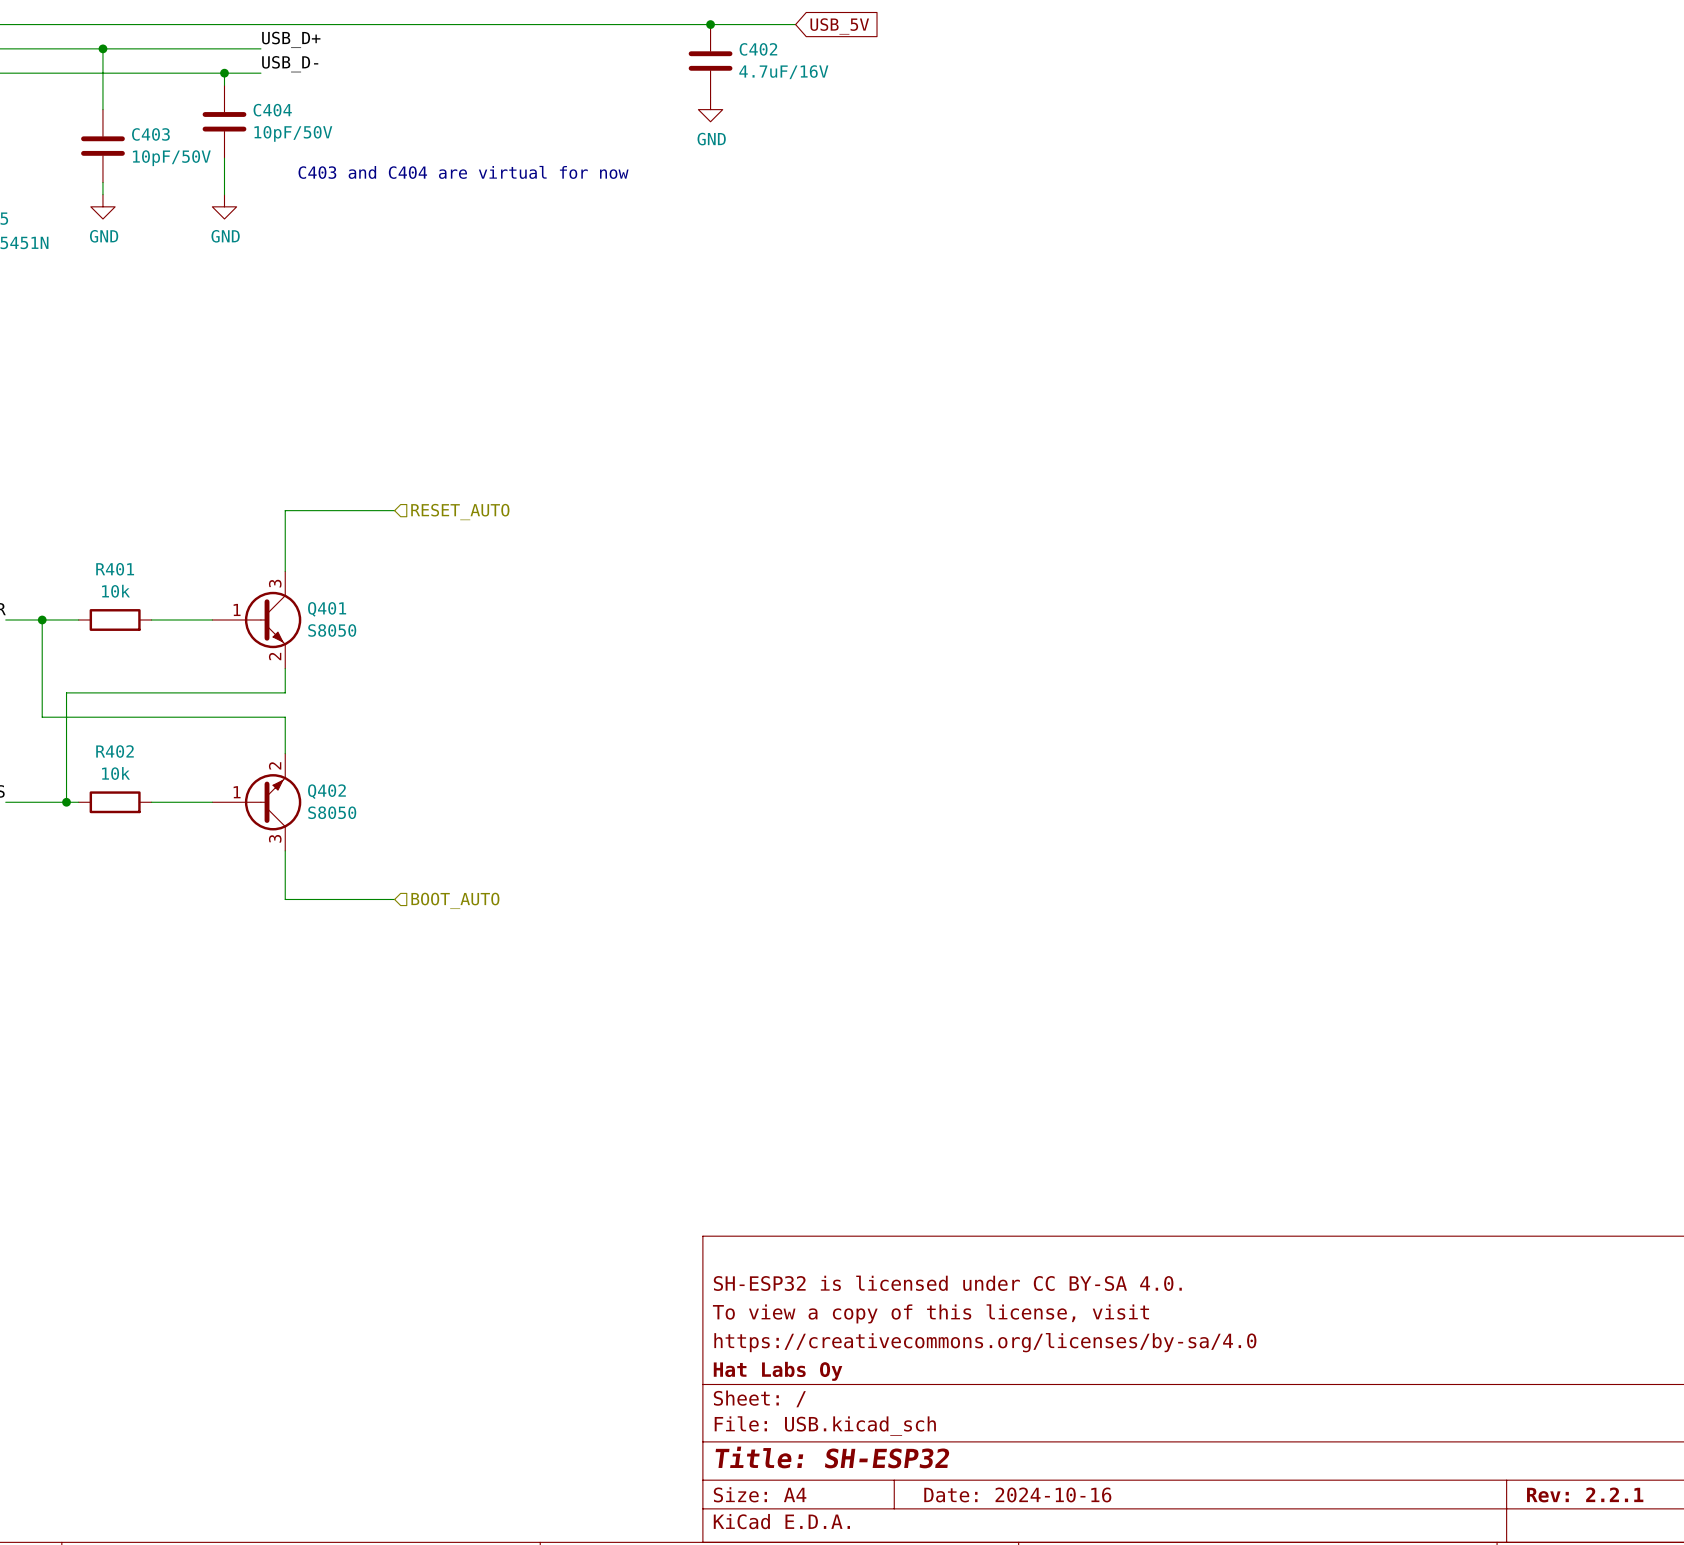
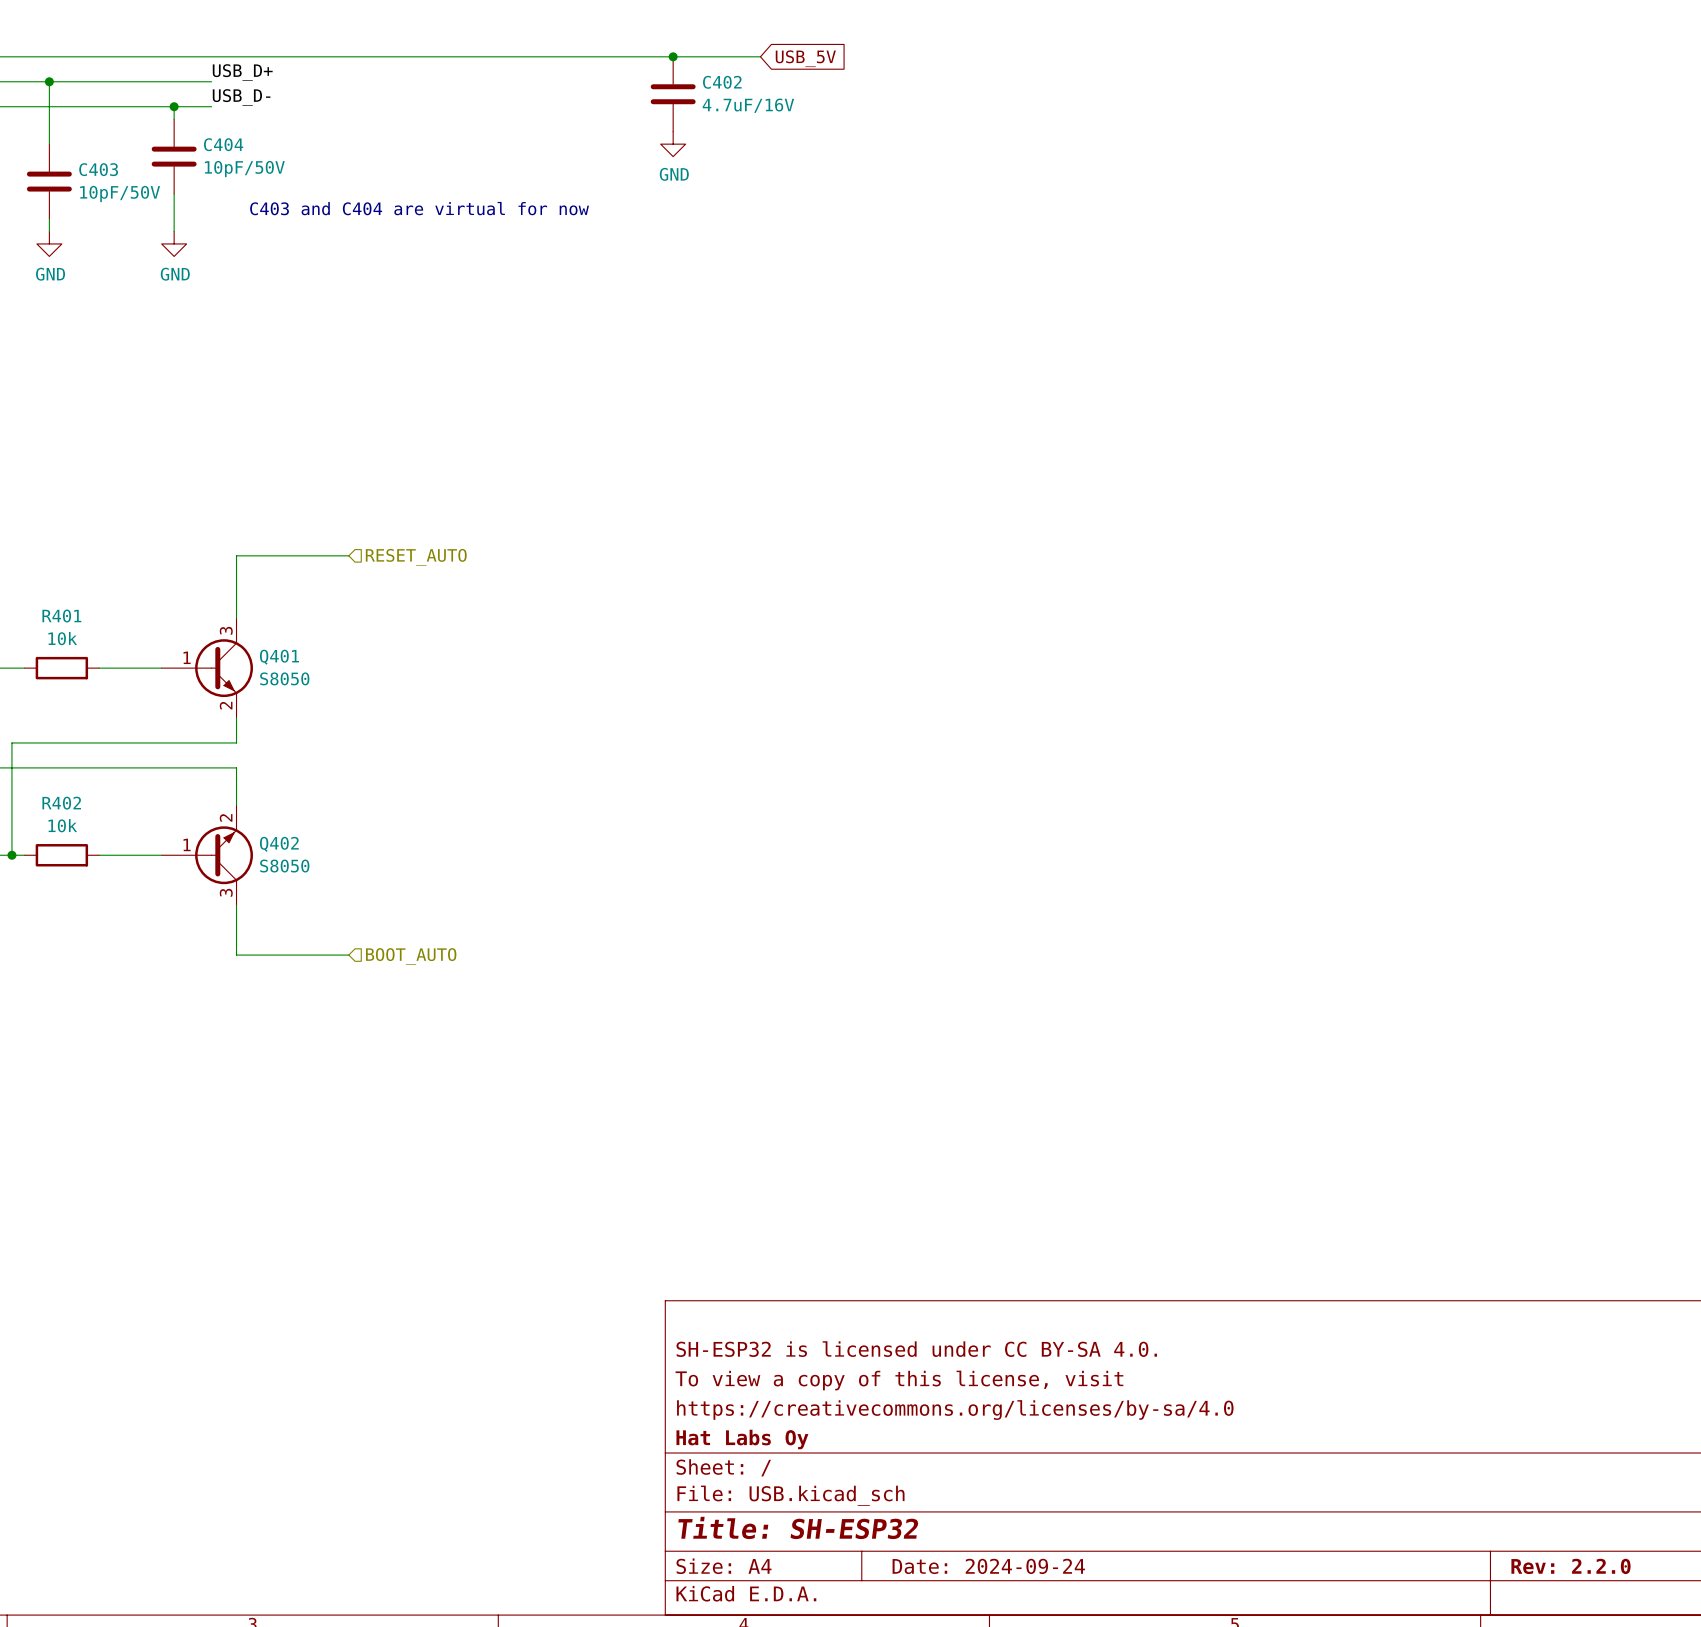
title block: Date: 2024-10-16 (1017, 1494) -> Date: 2024-09-24 (988, 1566)
title block: Rev: 2.2.1 (1585, 1494) -> Rev: 2.2.0 (1570, 1566)

